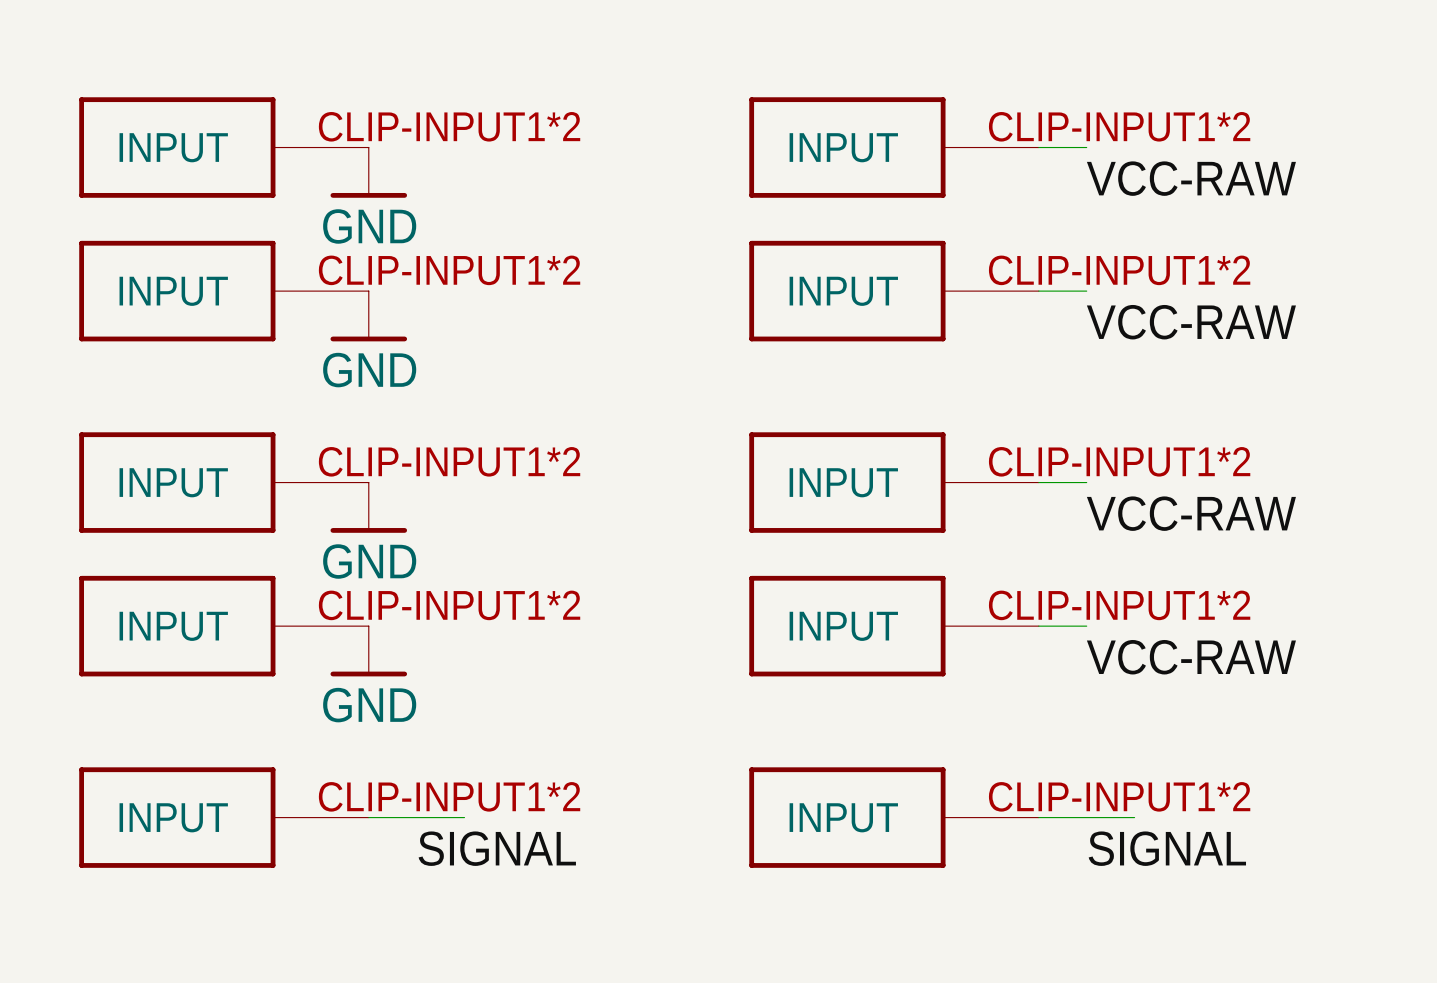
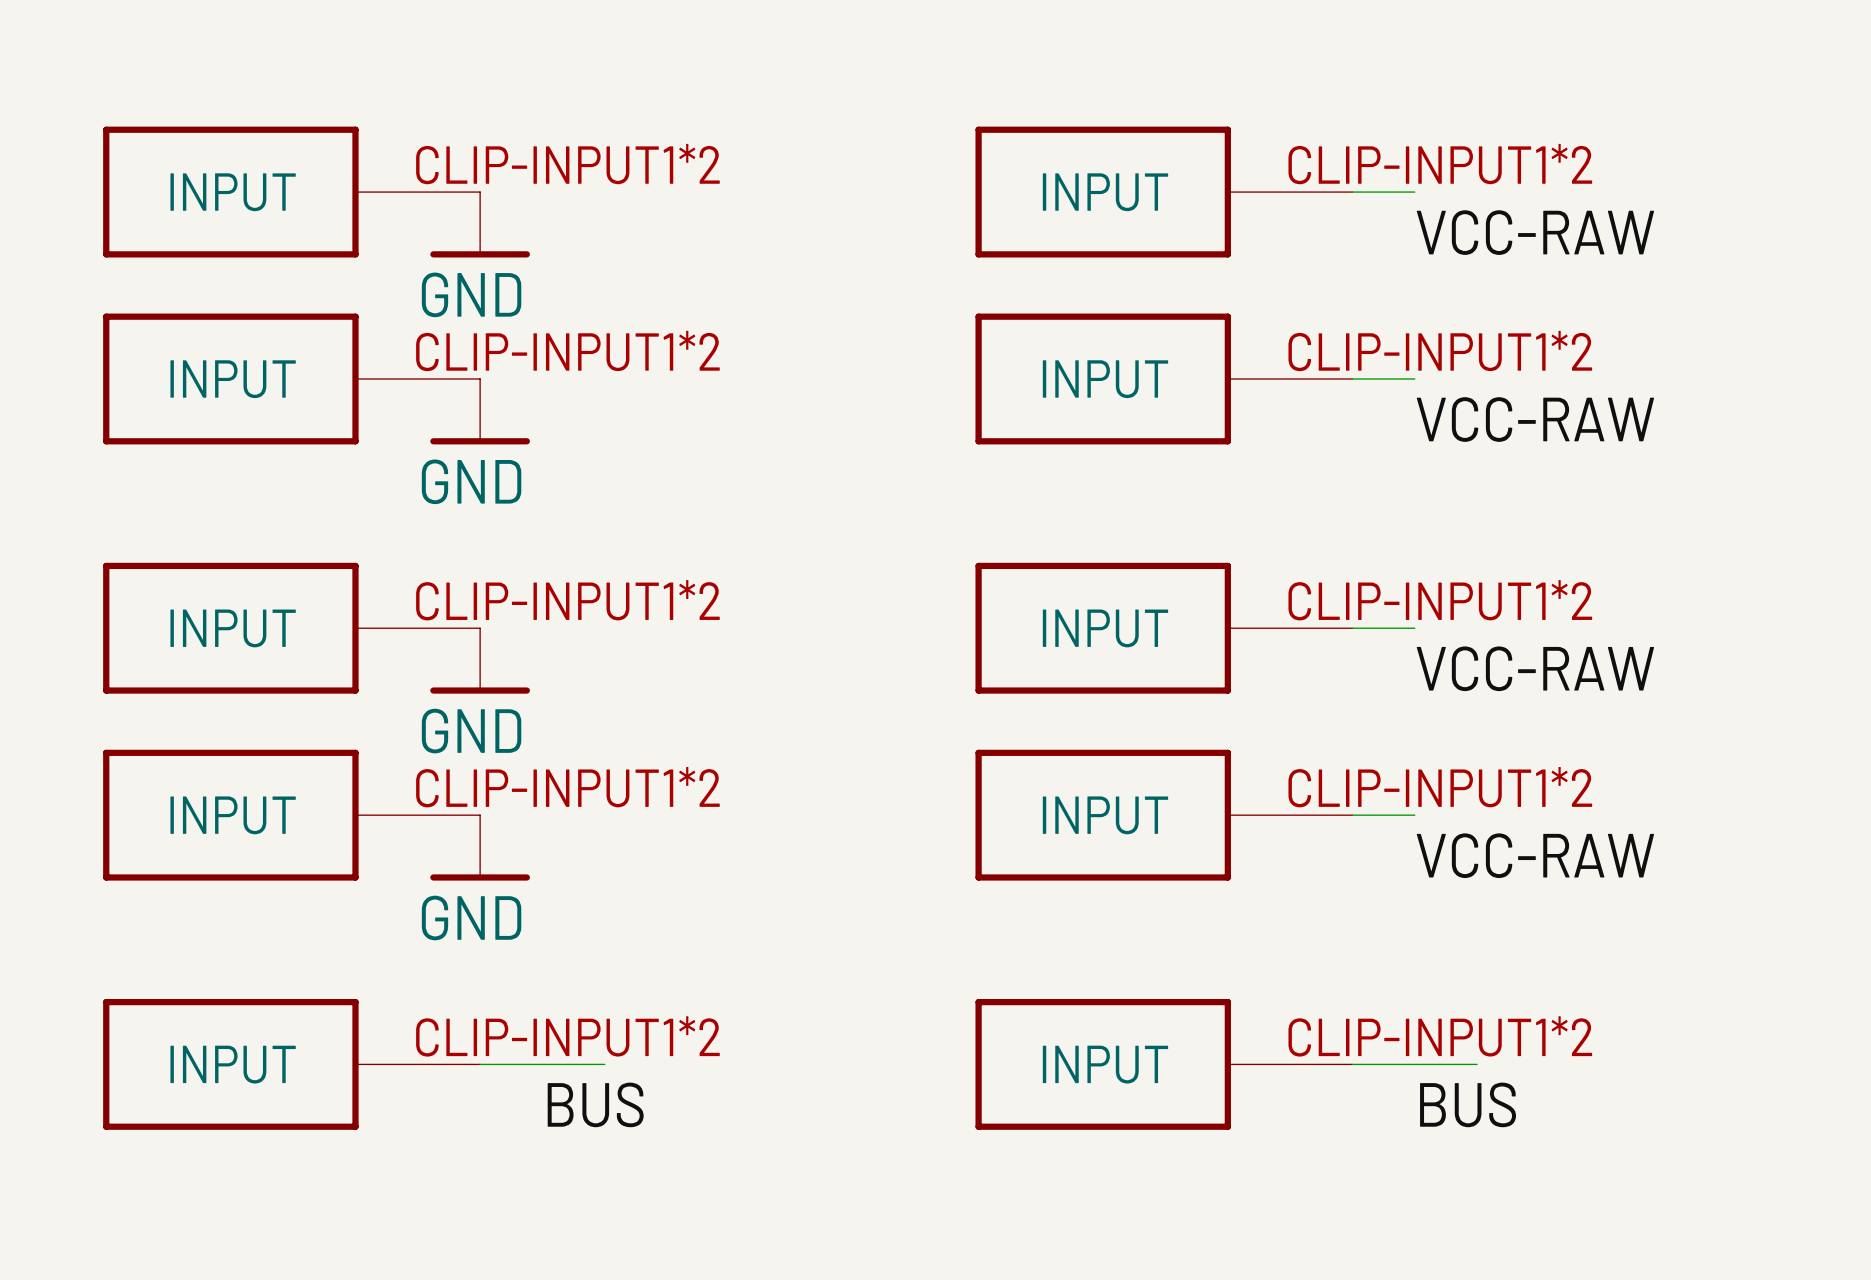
label: SIGNAL (497, 848) -> BUS (595, 1104)
label: SIGNAL (1167, 848) -> BUS (1468, 1104)

